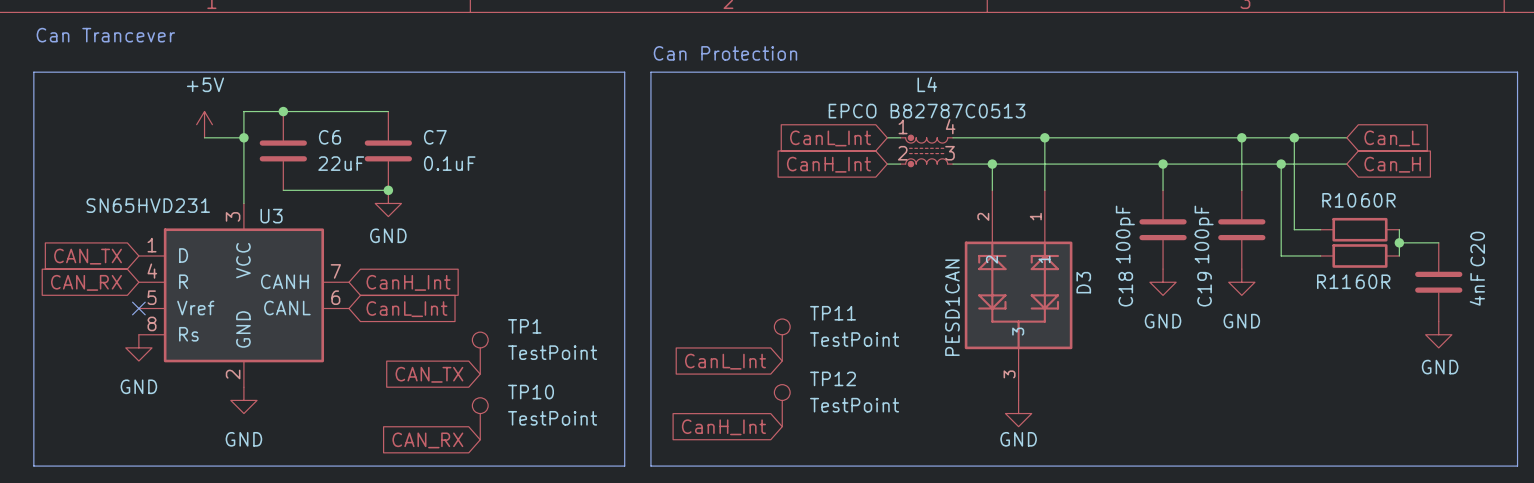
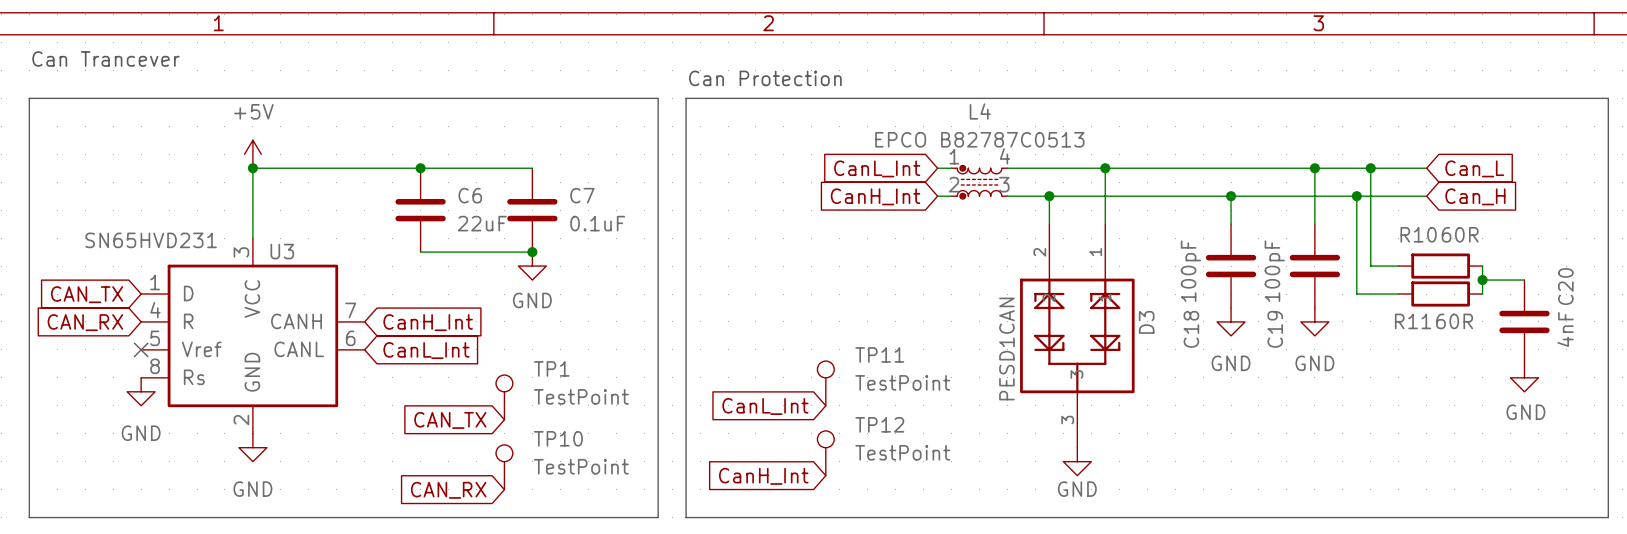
junction: (283, 111) -> none
wire: (388, 111) (243, 111) (243, 137) (204, 137) -> none
power symbol position: +5V (204, 124) -> +5V (252, 154)
wire: none -> (252, 168) (532, 168)
C6 position: (283, 150) -> (420, 210)
C7 position: (388, 150) -> (532, 210)
wire: (283, 190) (388, 190) -> (420, 252) (532, 252)
junction position: (388, 190) -> (420, 168)
power symbol position: GND (388, 203) -> GND (532, 266)
junction: none -> (532, 252)

